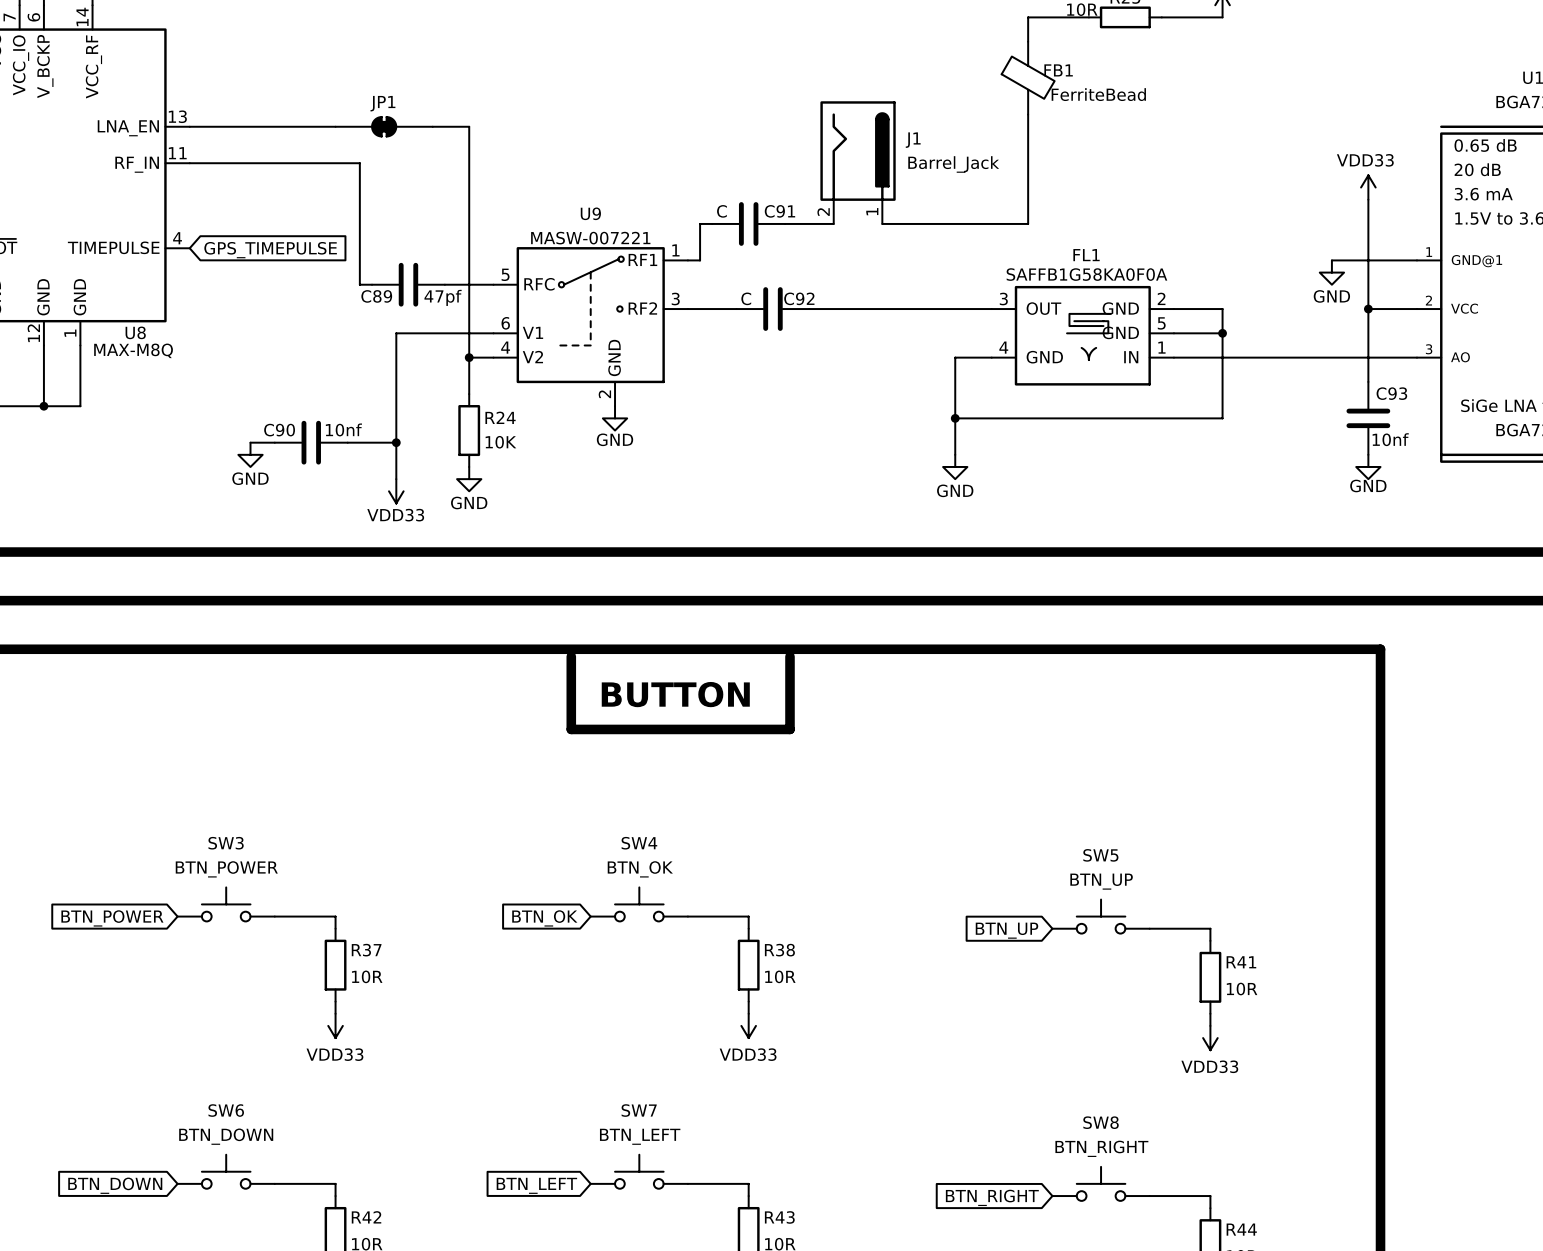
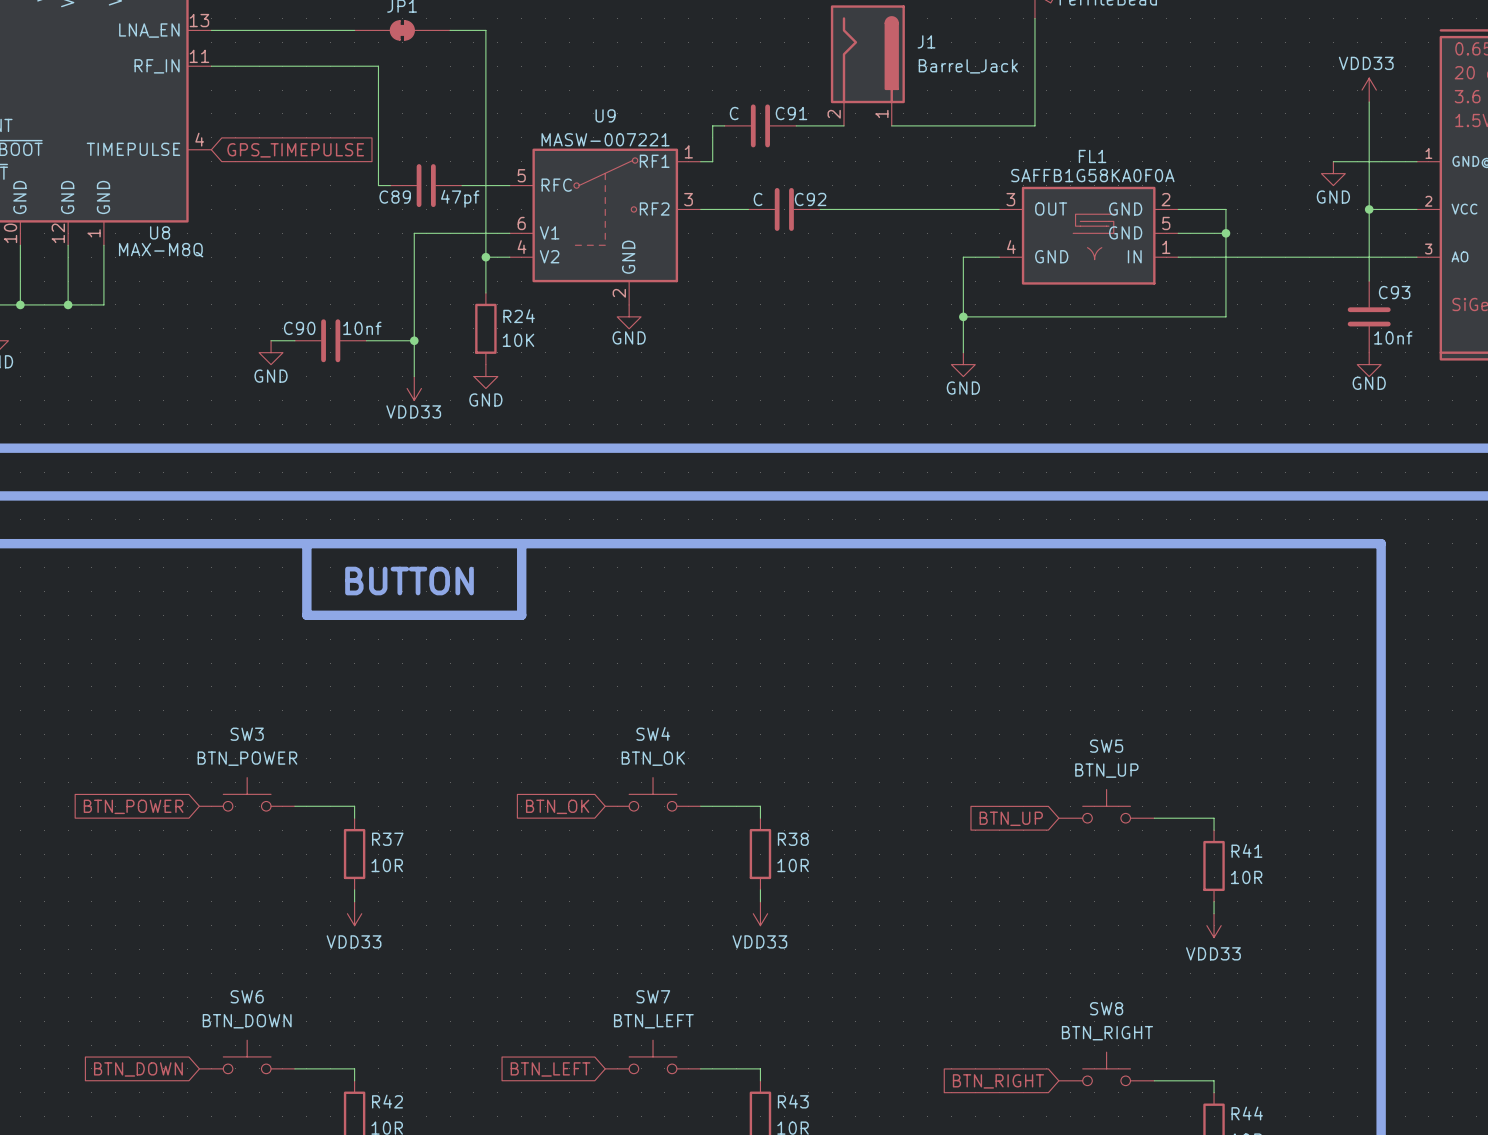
line: none -> (306, 543) (306, 615) (521, 615) (521, 543)
line: (571, 656) (571, 729) (789, 729) (789, 656) -> none
text: none -> BUTTON (409, 581)
text: BUTTON (675, 694) -> none

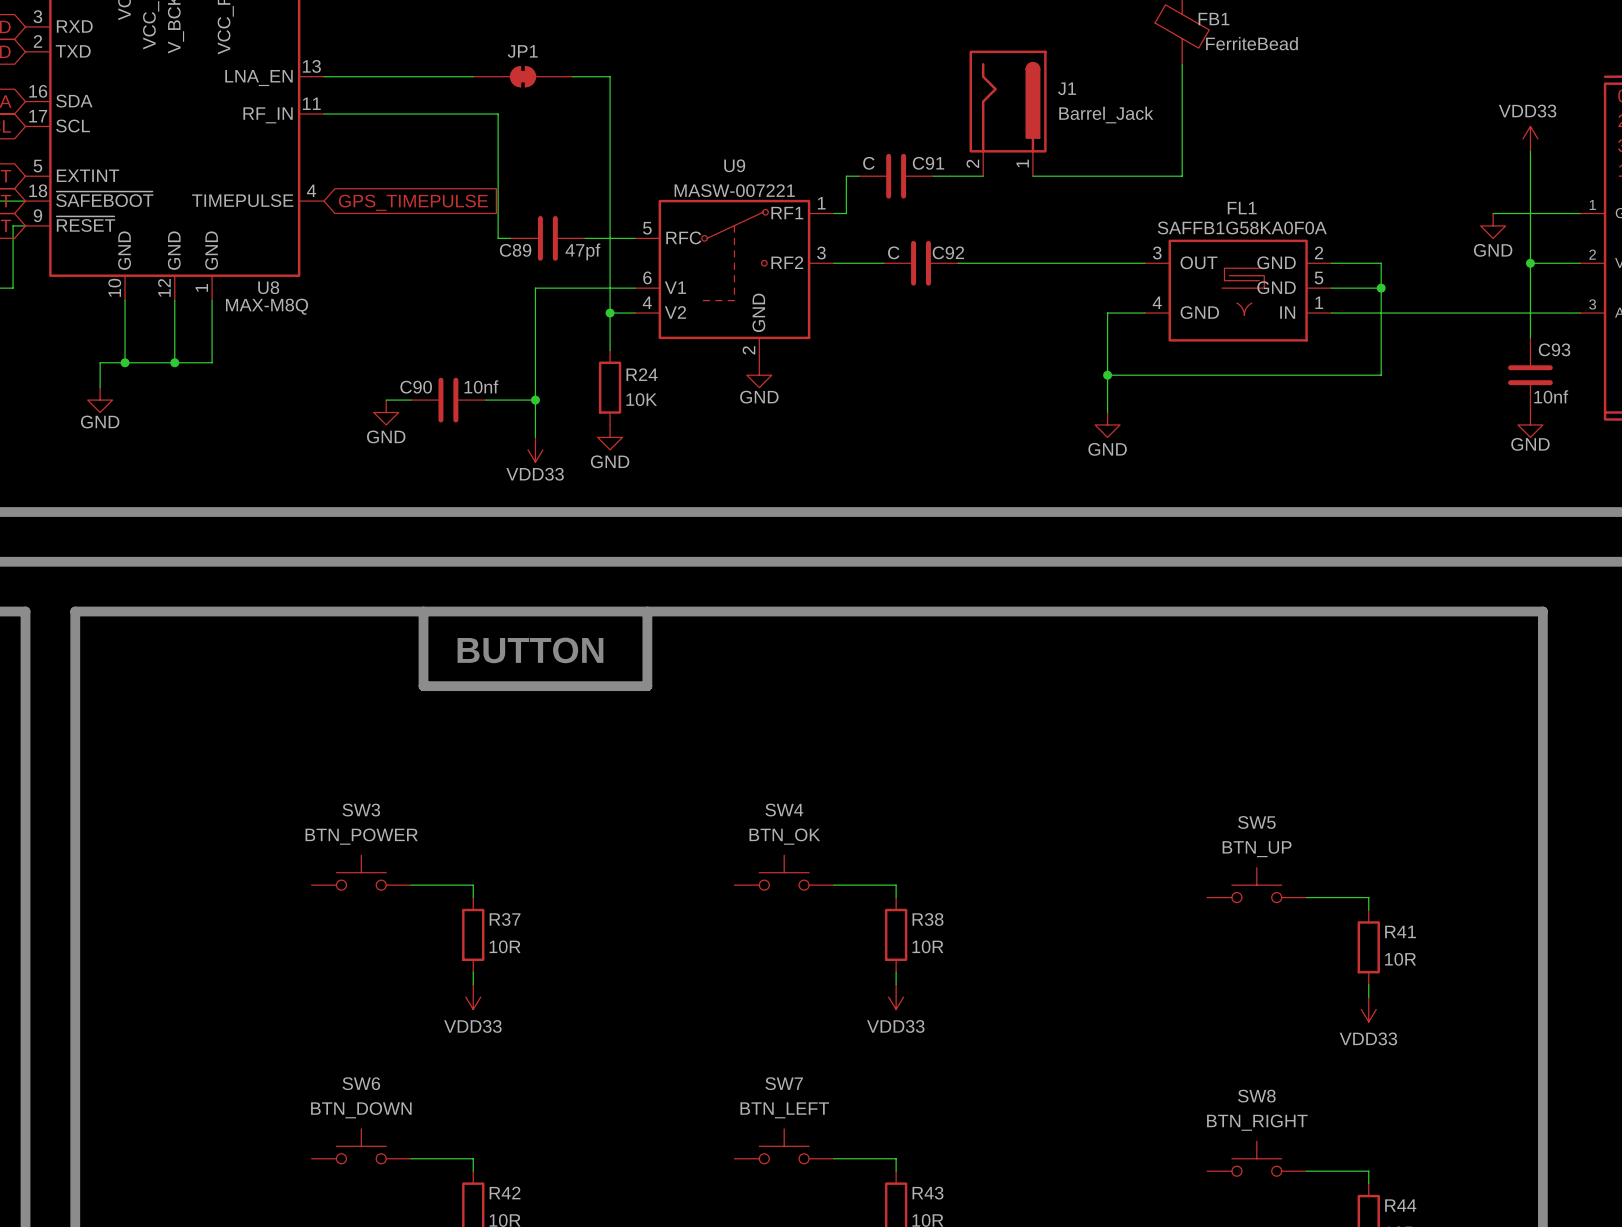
global label: BTN_POWER (133, 806) -> none
global label: BTN_OK (557, 806) -> none
global label: BTN_UP (1011, 818) -> none
global label: BTN_DOWN (138, 1069) -> none
global label: BTN_LEFT (550, 1069) -> none
global label: BTN_RIGHT (998, 1081) -> none

